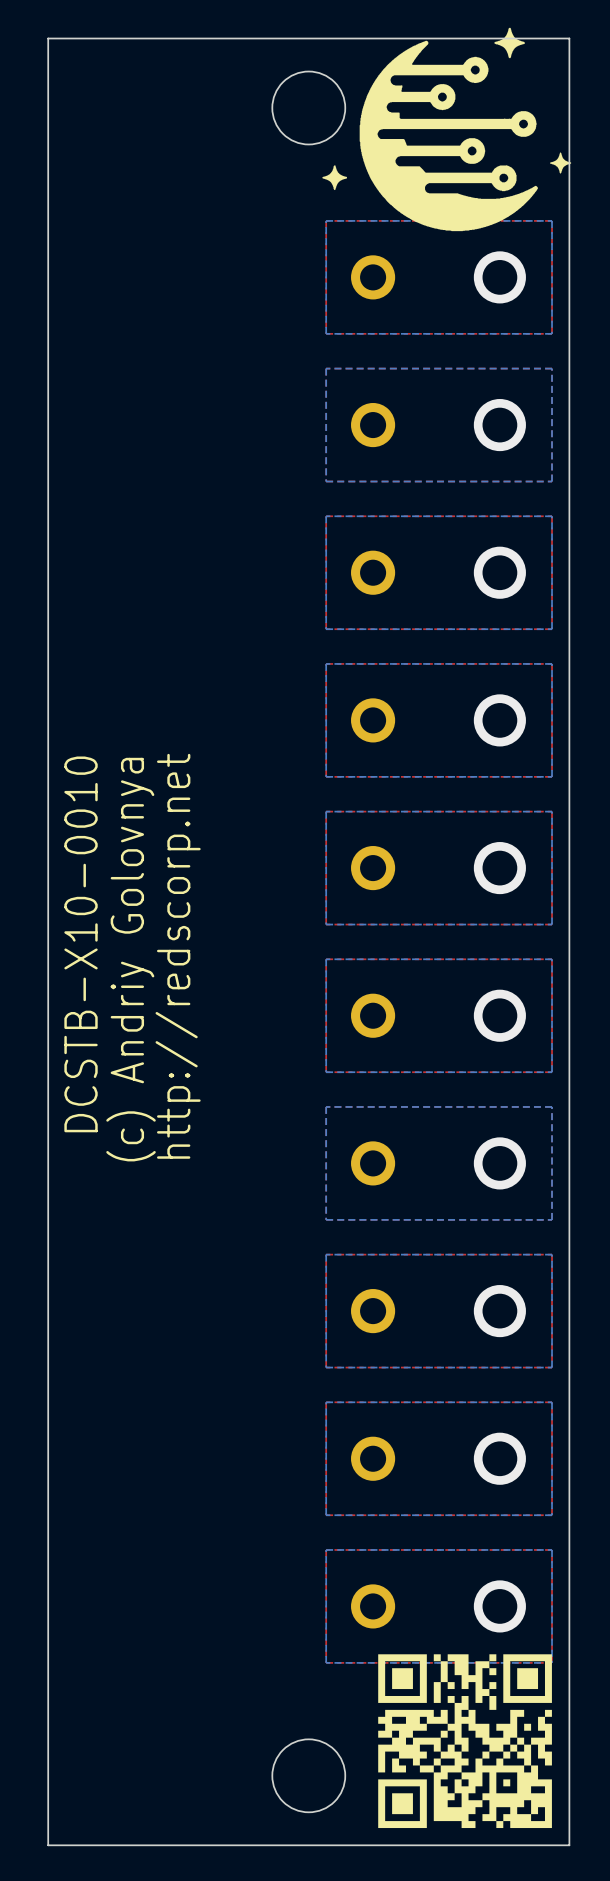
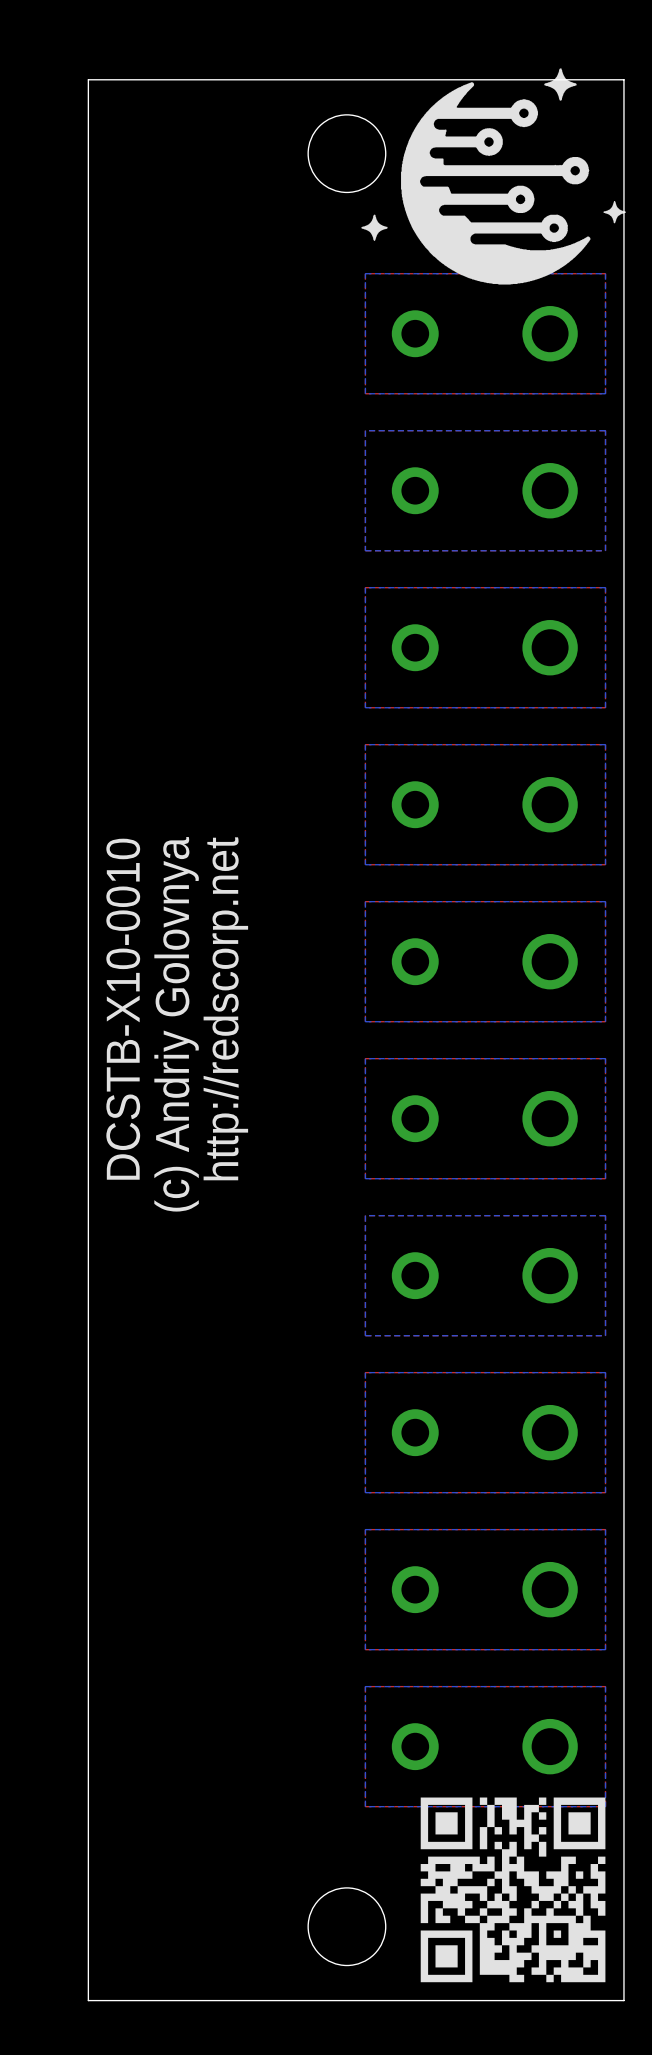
board edge: (65, 38) (48, 38) (48, 1845) (65, 1845) -> (88, 79) (88, 2000)
text position: DCSTB-X10-0010 (81, 944) -> DCSTB-X10-0010 (123, 1009)
text position: http://redscorp.net (178, 956) -> http://redscorp.net (225, 1008)
text position: (c) Andriy Golovnya (131, 959) -> (c) Andriy Golovnya (176, 1024)

